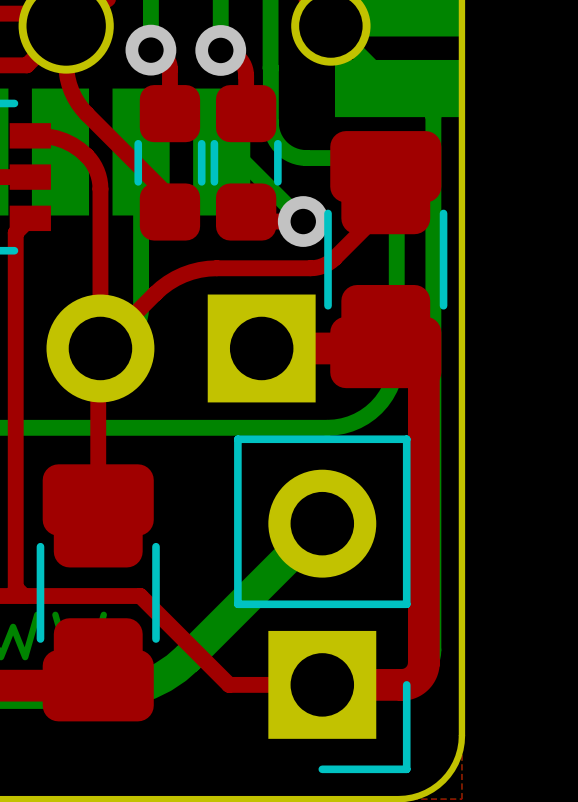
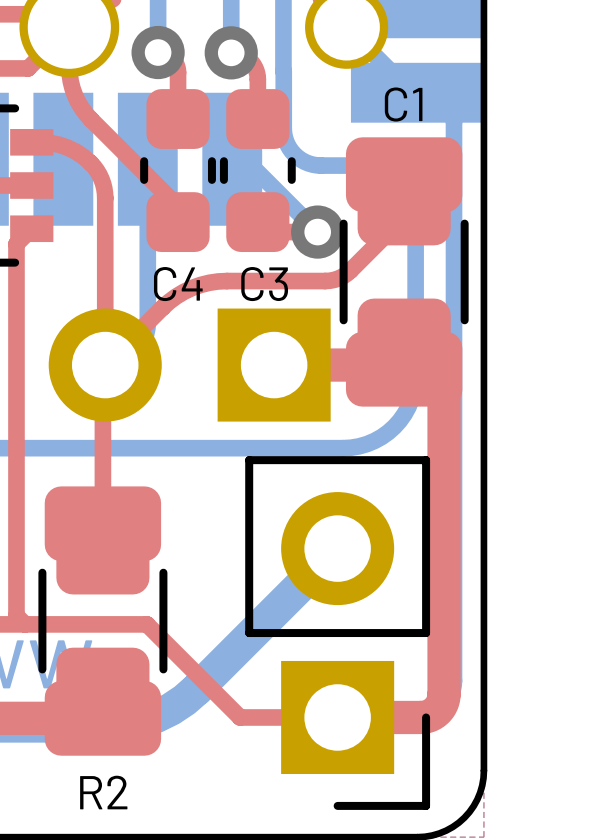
C1 name: none -> C1 (403, 104)
part: (169, 162) -> none
C4: none -> (178, 170)
part: (246, 162) -> none
C3: none -> (257, 170)
R2 name: none -> R2 (103, 792)

